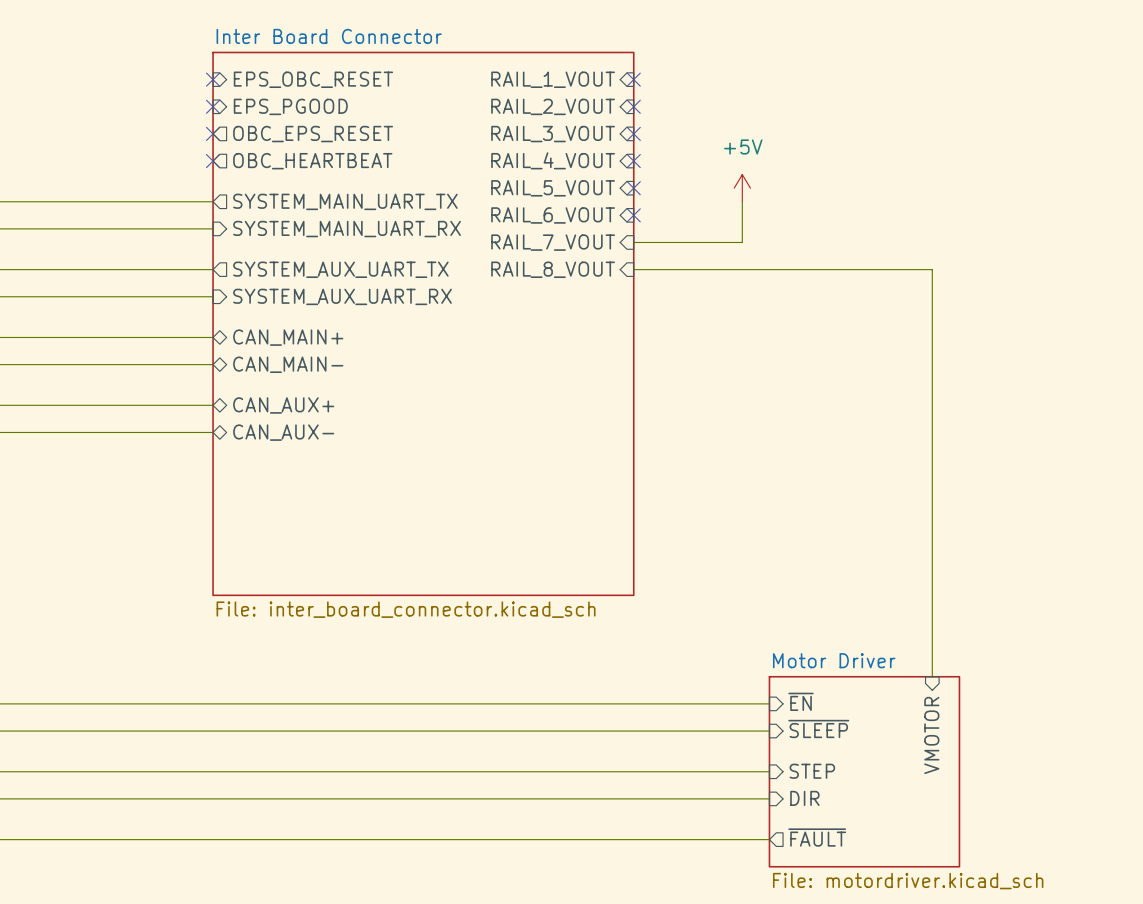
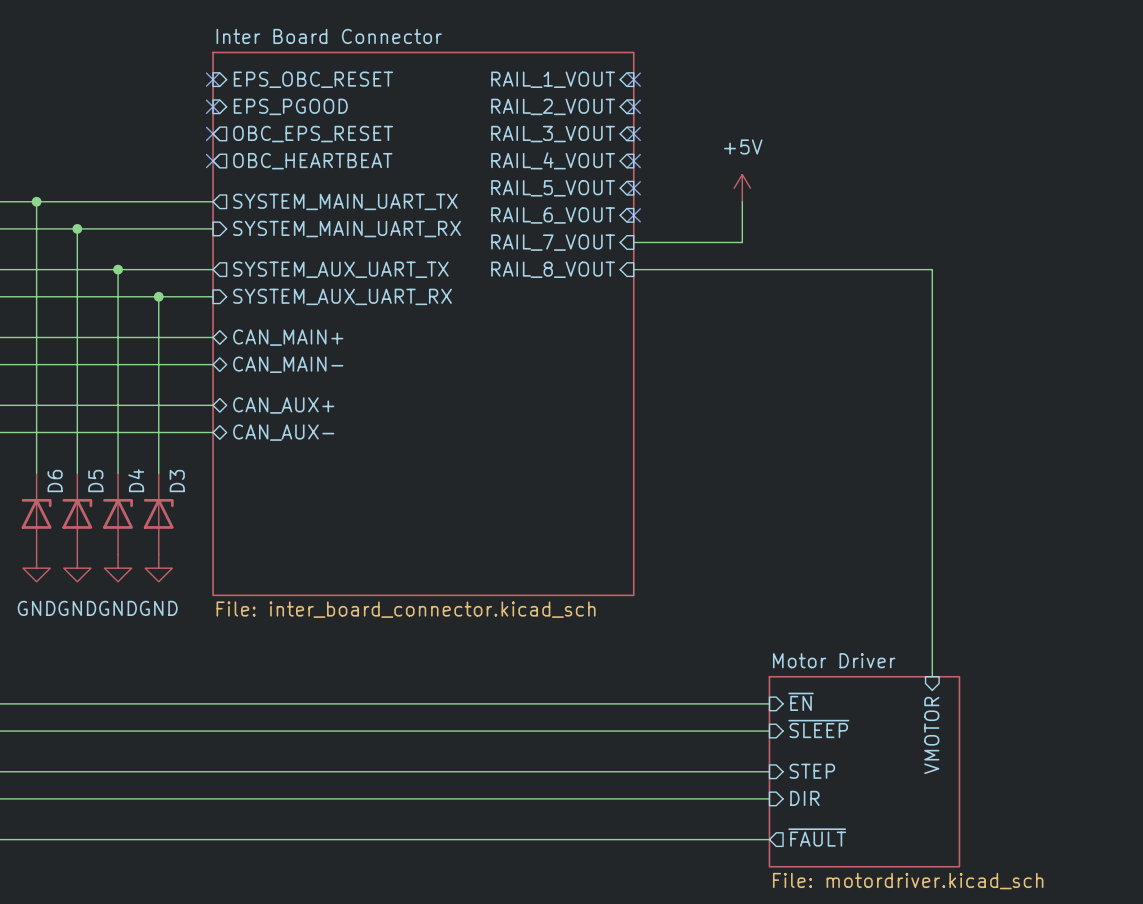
wire: none -> (36, 201) (36, 473)
junction: none -> (36, 201)
wire: none -> (77, 228) (77, 473)
junction: none -> (77, 228)
wire: none -> (118, 269) (118, 473)
junction: none -> (118, 269)
wire: none -> (158, 296) (158, 473)
junction: none -> (158, 296)
D6: none -> (36, 513)
D5: none -> (77, 513)
D4: none -> (118, 513)
D3: none -> (158, 513)
power symbol: none -> GND (36, 568)
power symbol: none -> GND (77, 568)
power symbol: none -> GND (118, 568)
power symbol: none -> GND (158, 568)

